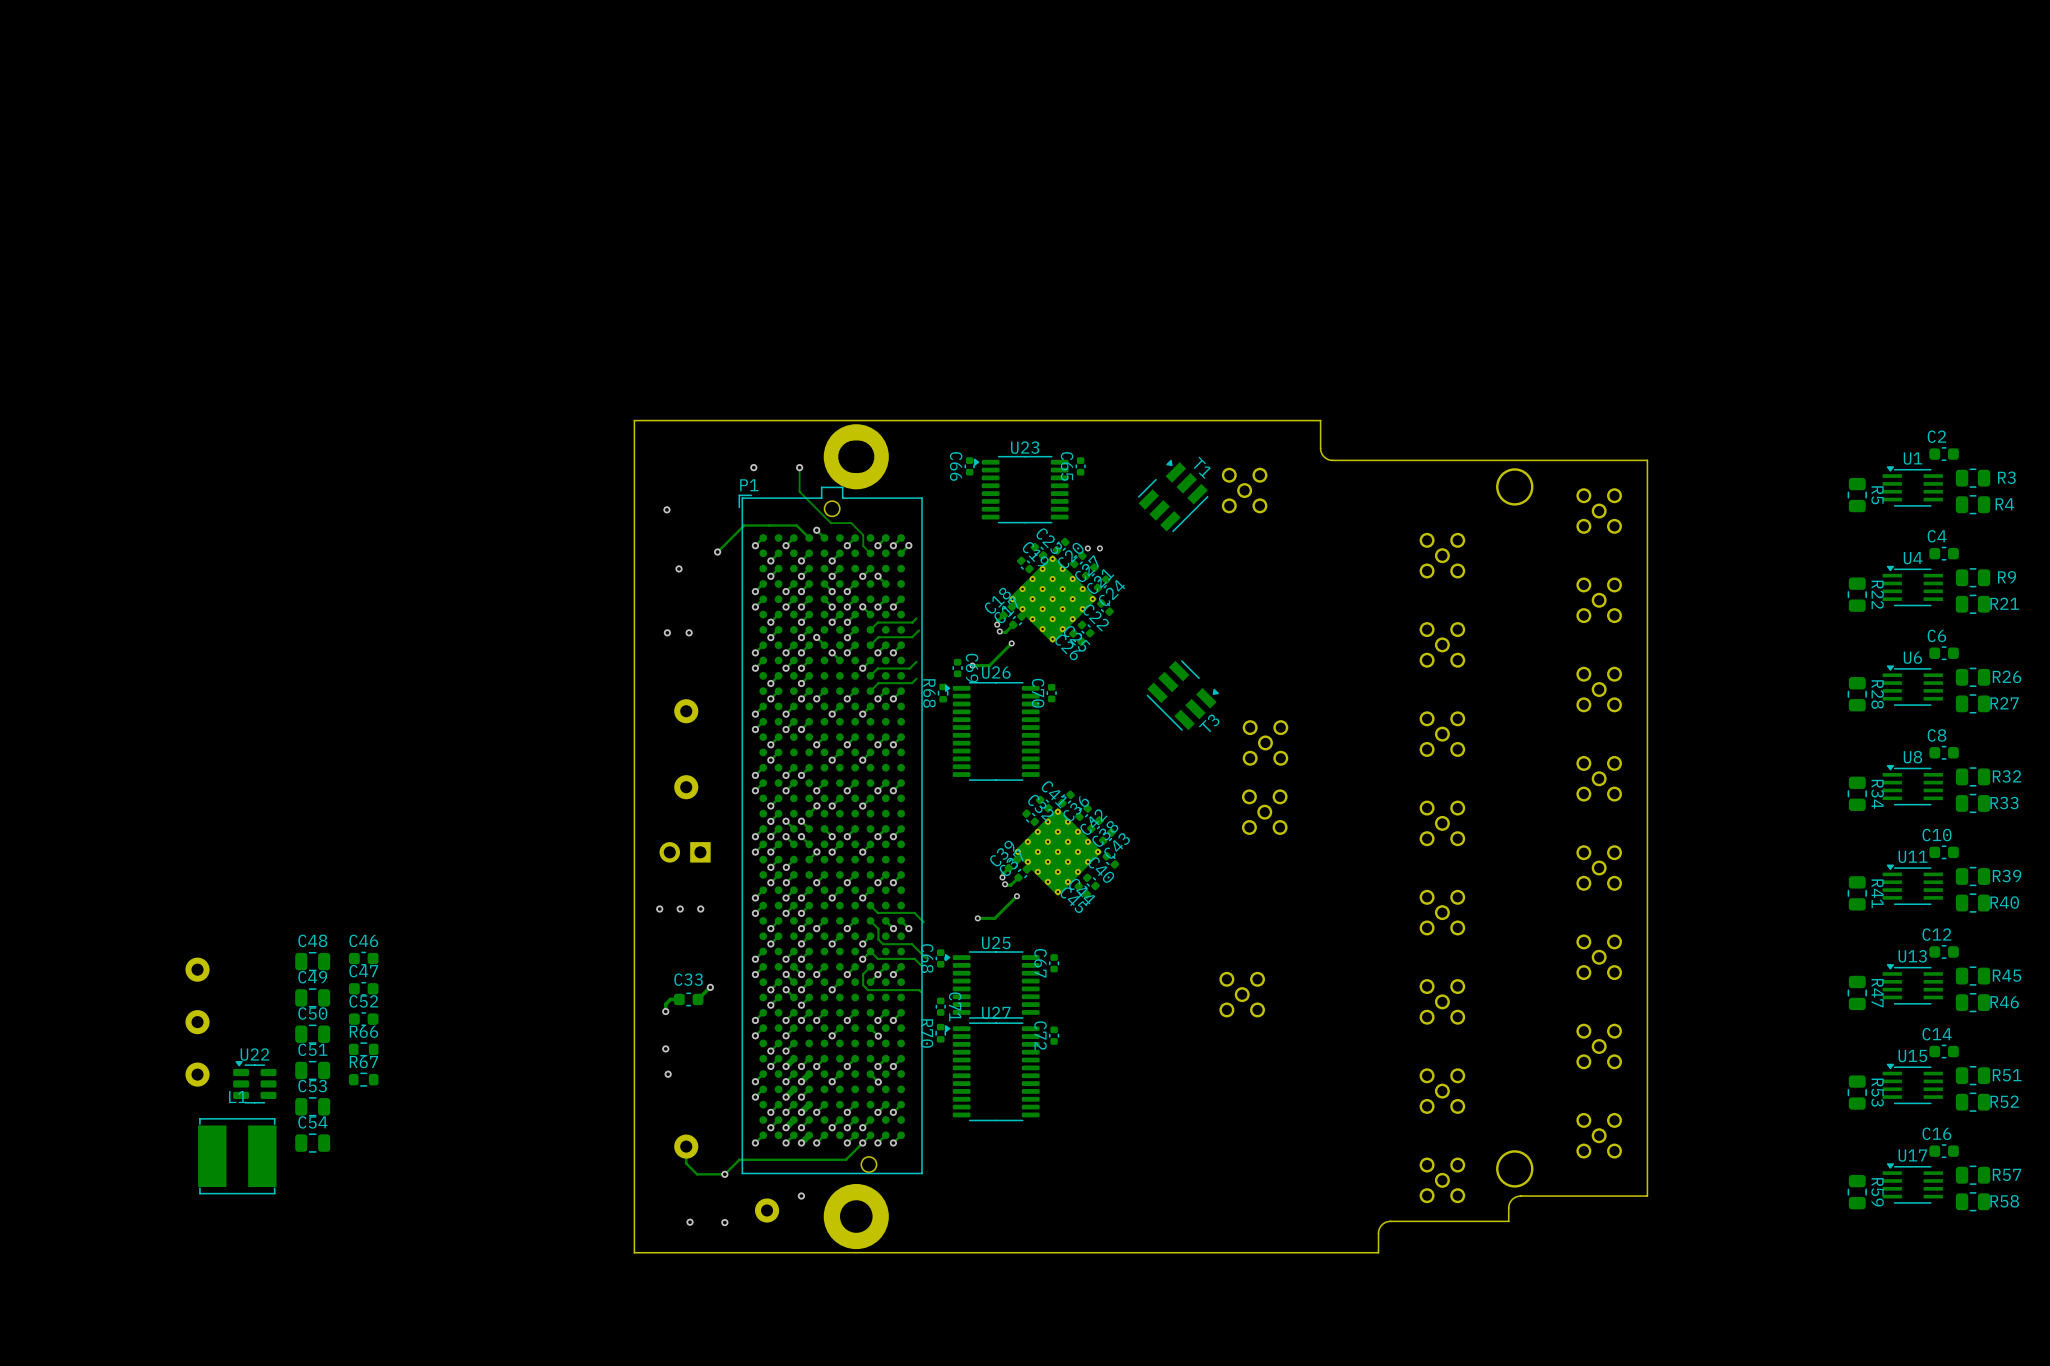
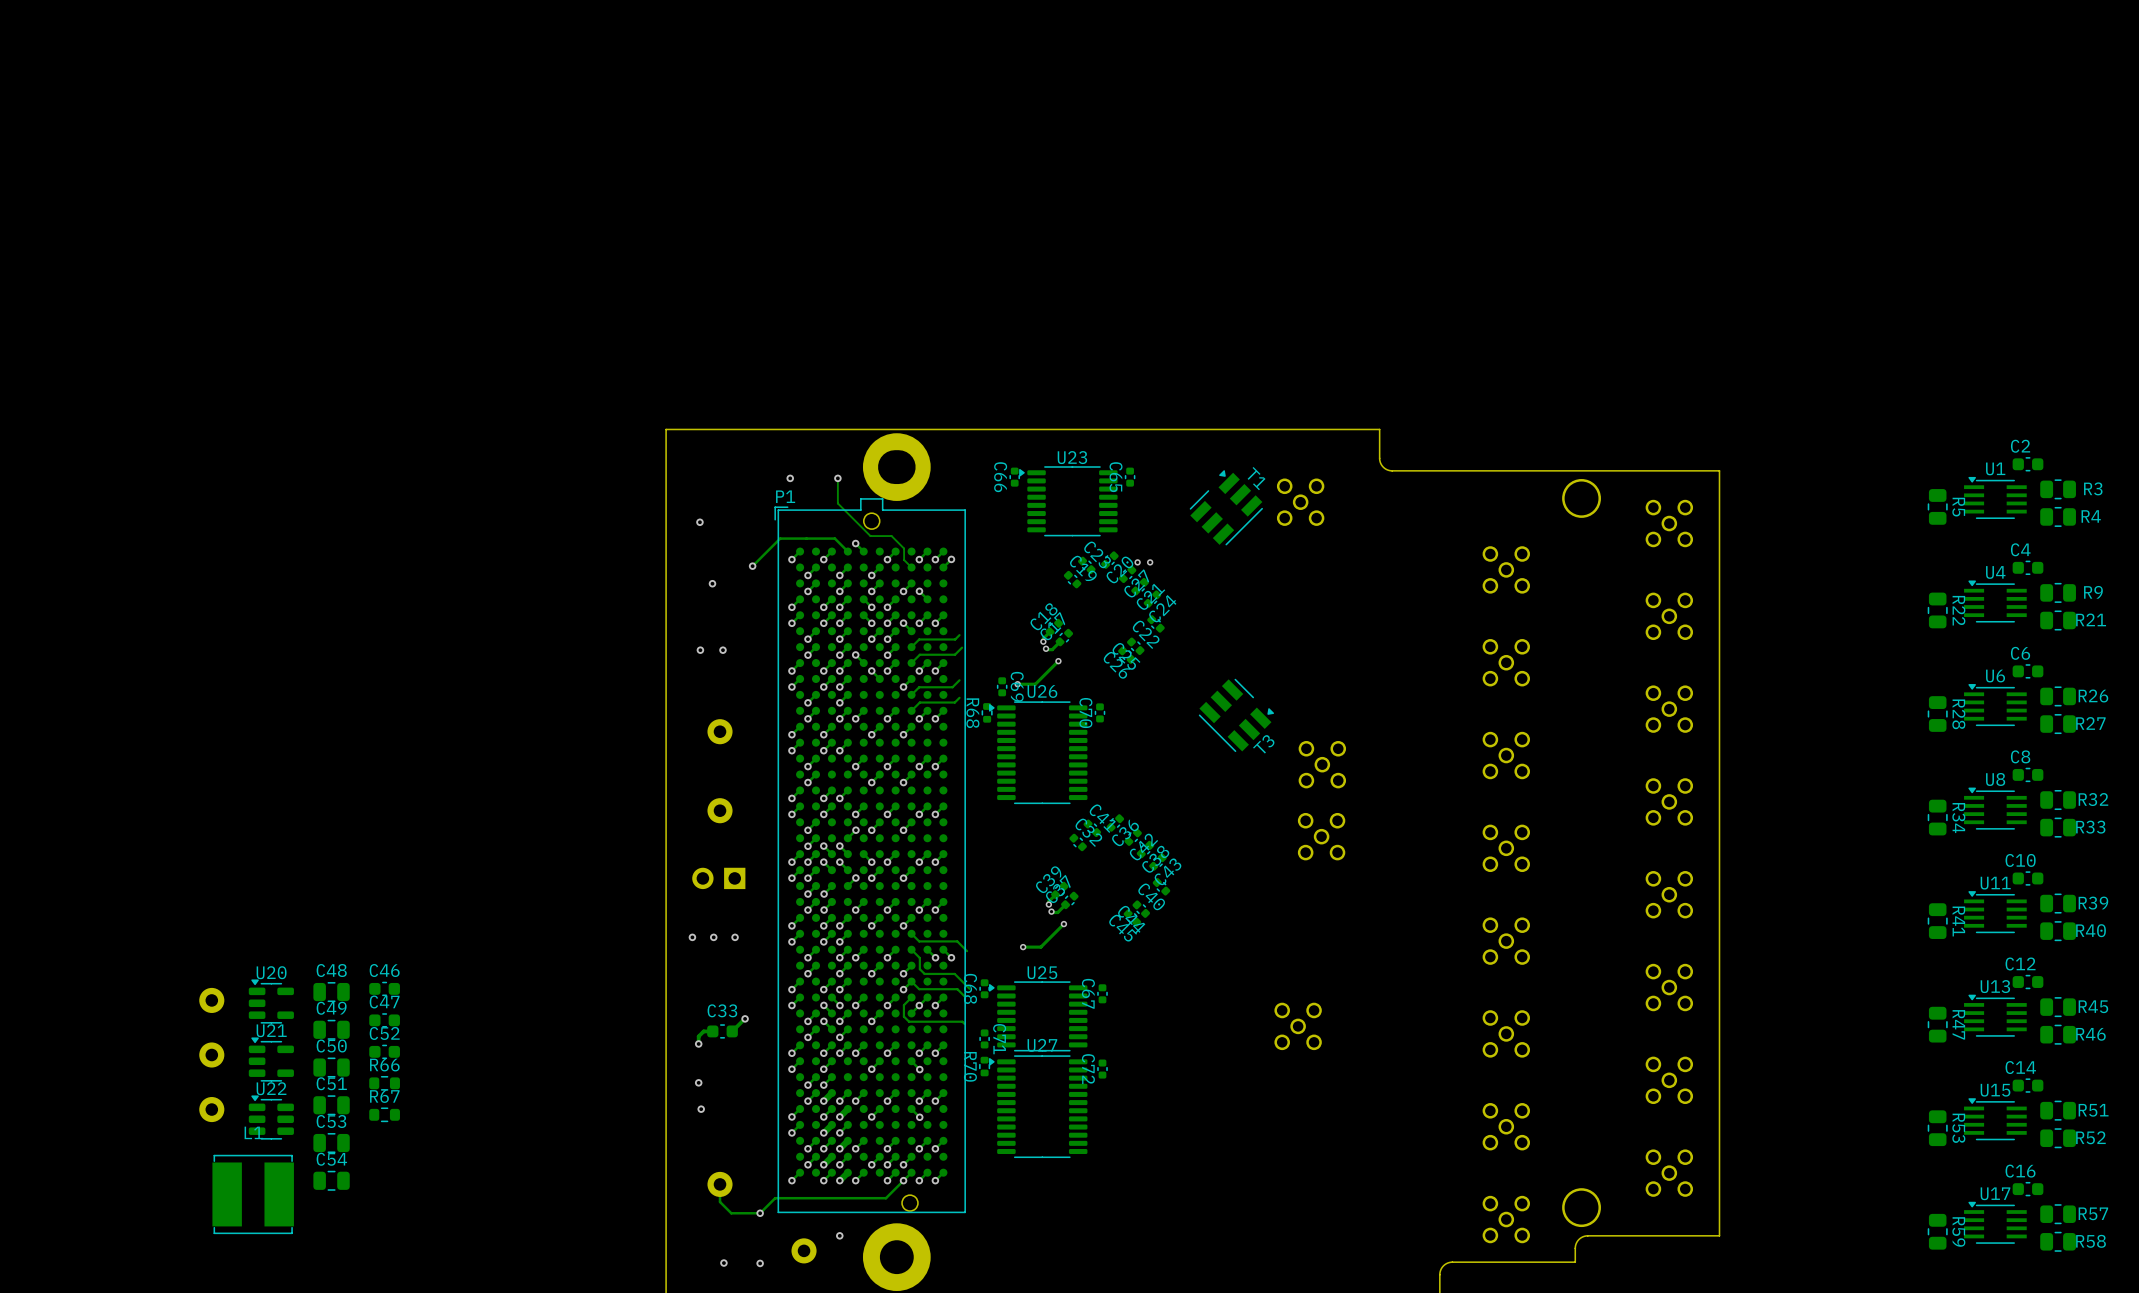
part: (1052, 599) -> none
part: (1057, 851) -> none
U20: none -> (271, 1001)
U21: none -> (271, 1059)

